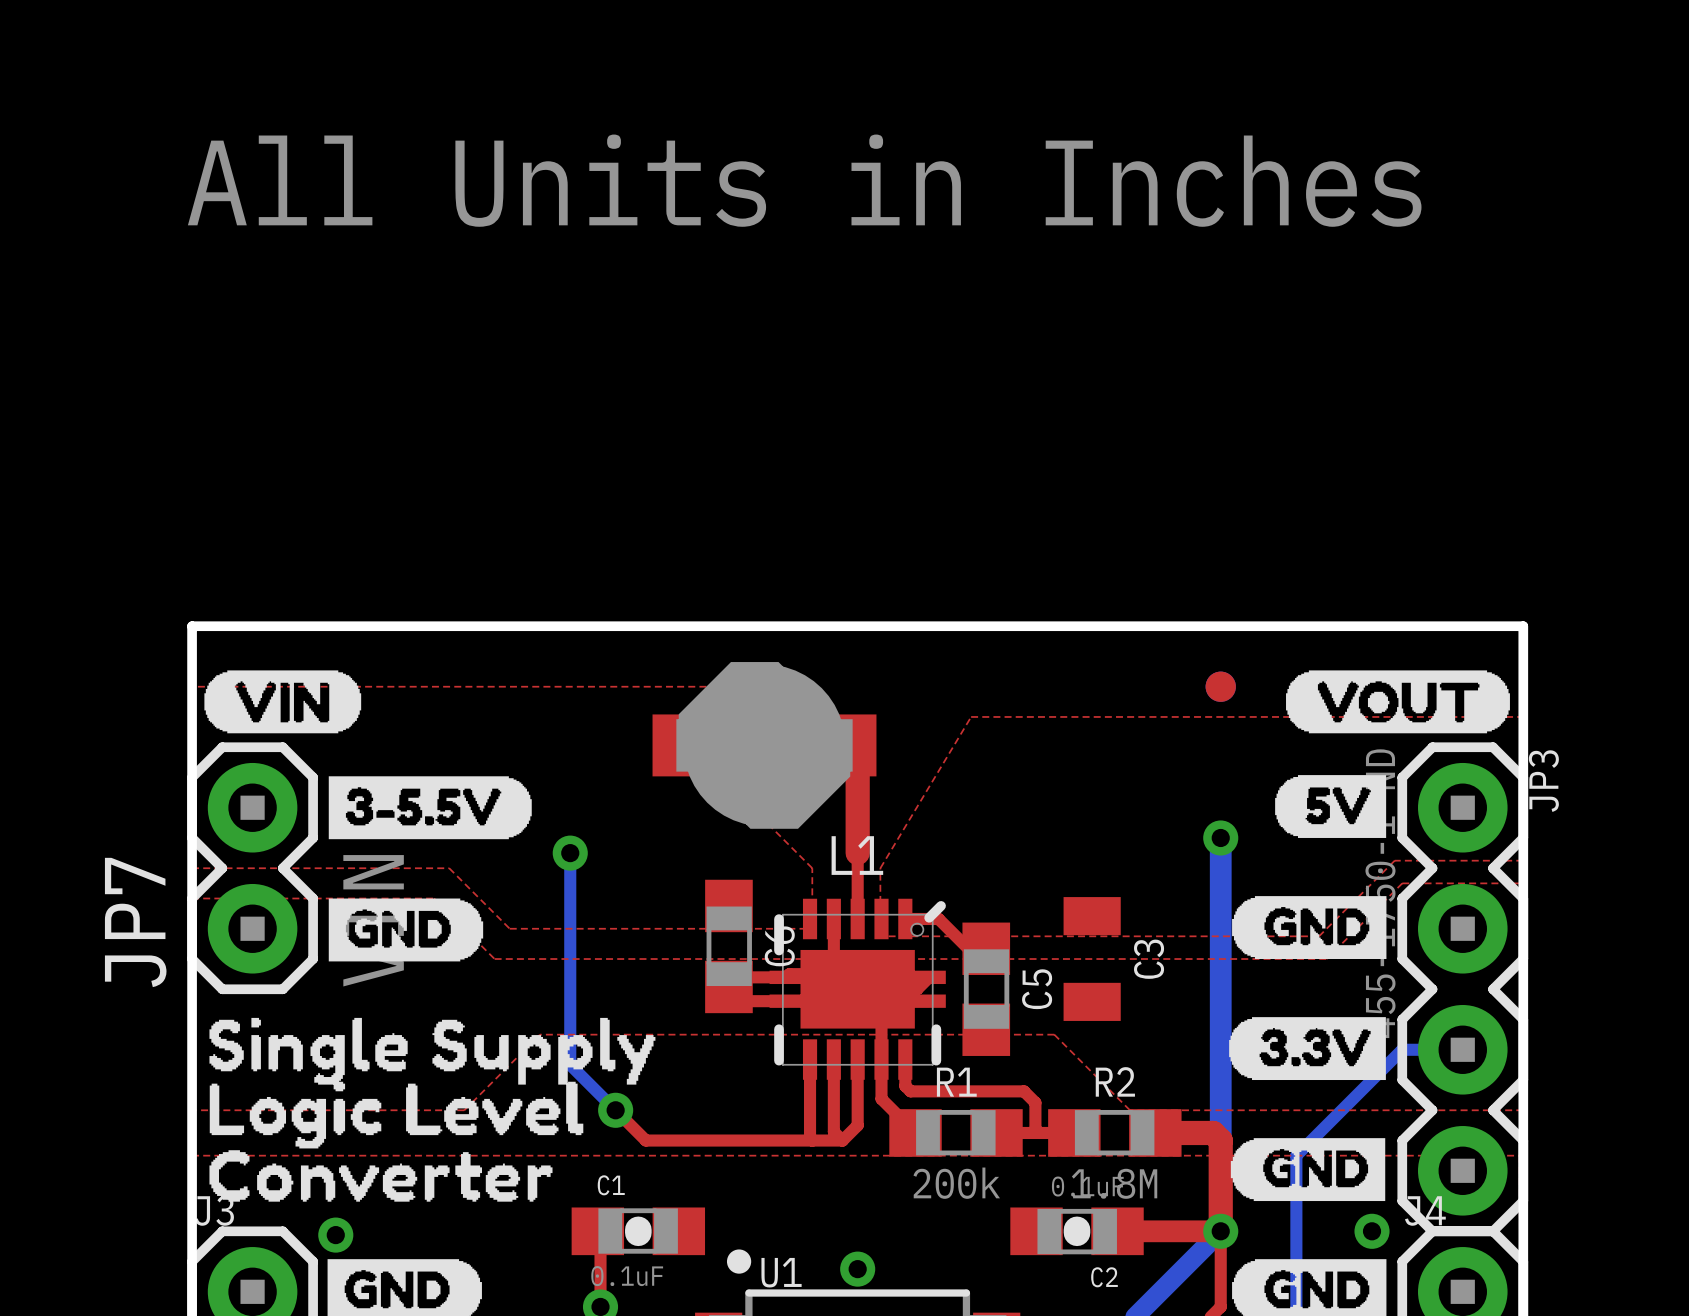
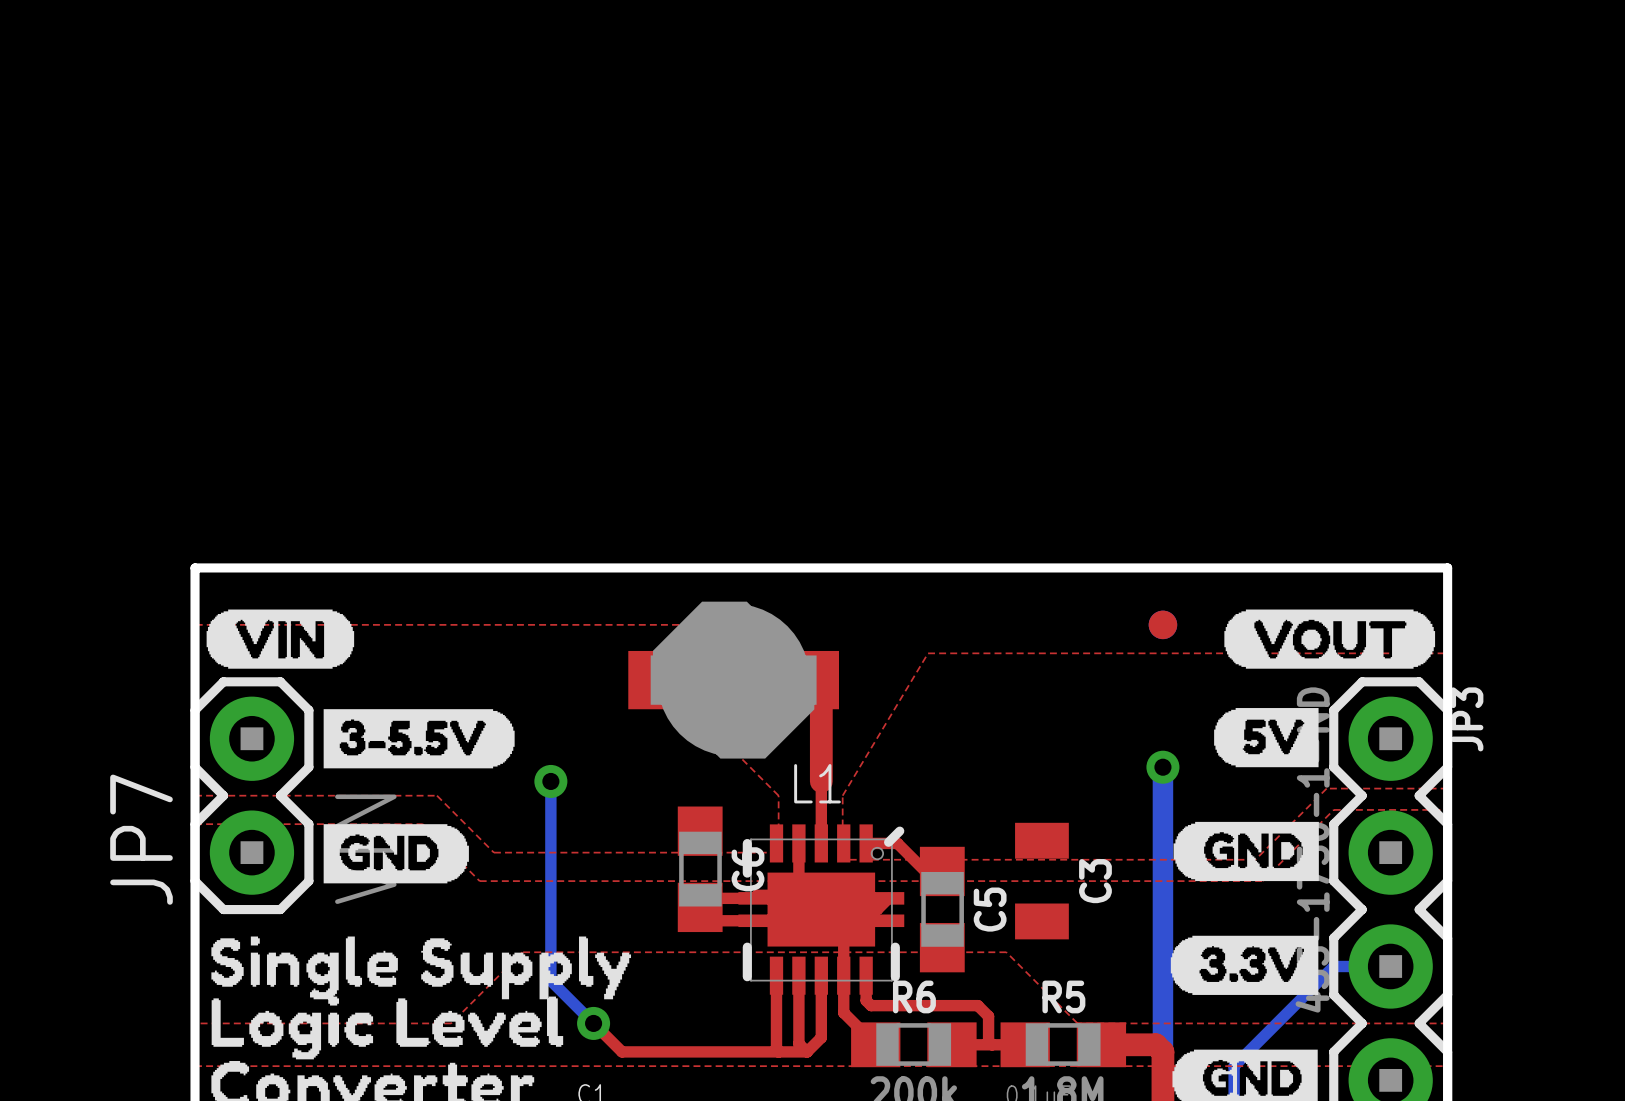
text: All Units in Inches (804, 180) -> none
R2 name: R2 (1115, 1081) -> R5 (1063, 996)
R1 name: R1 (956, 1082) -> R6 (914, 996)

